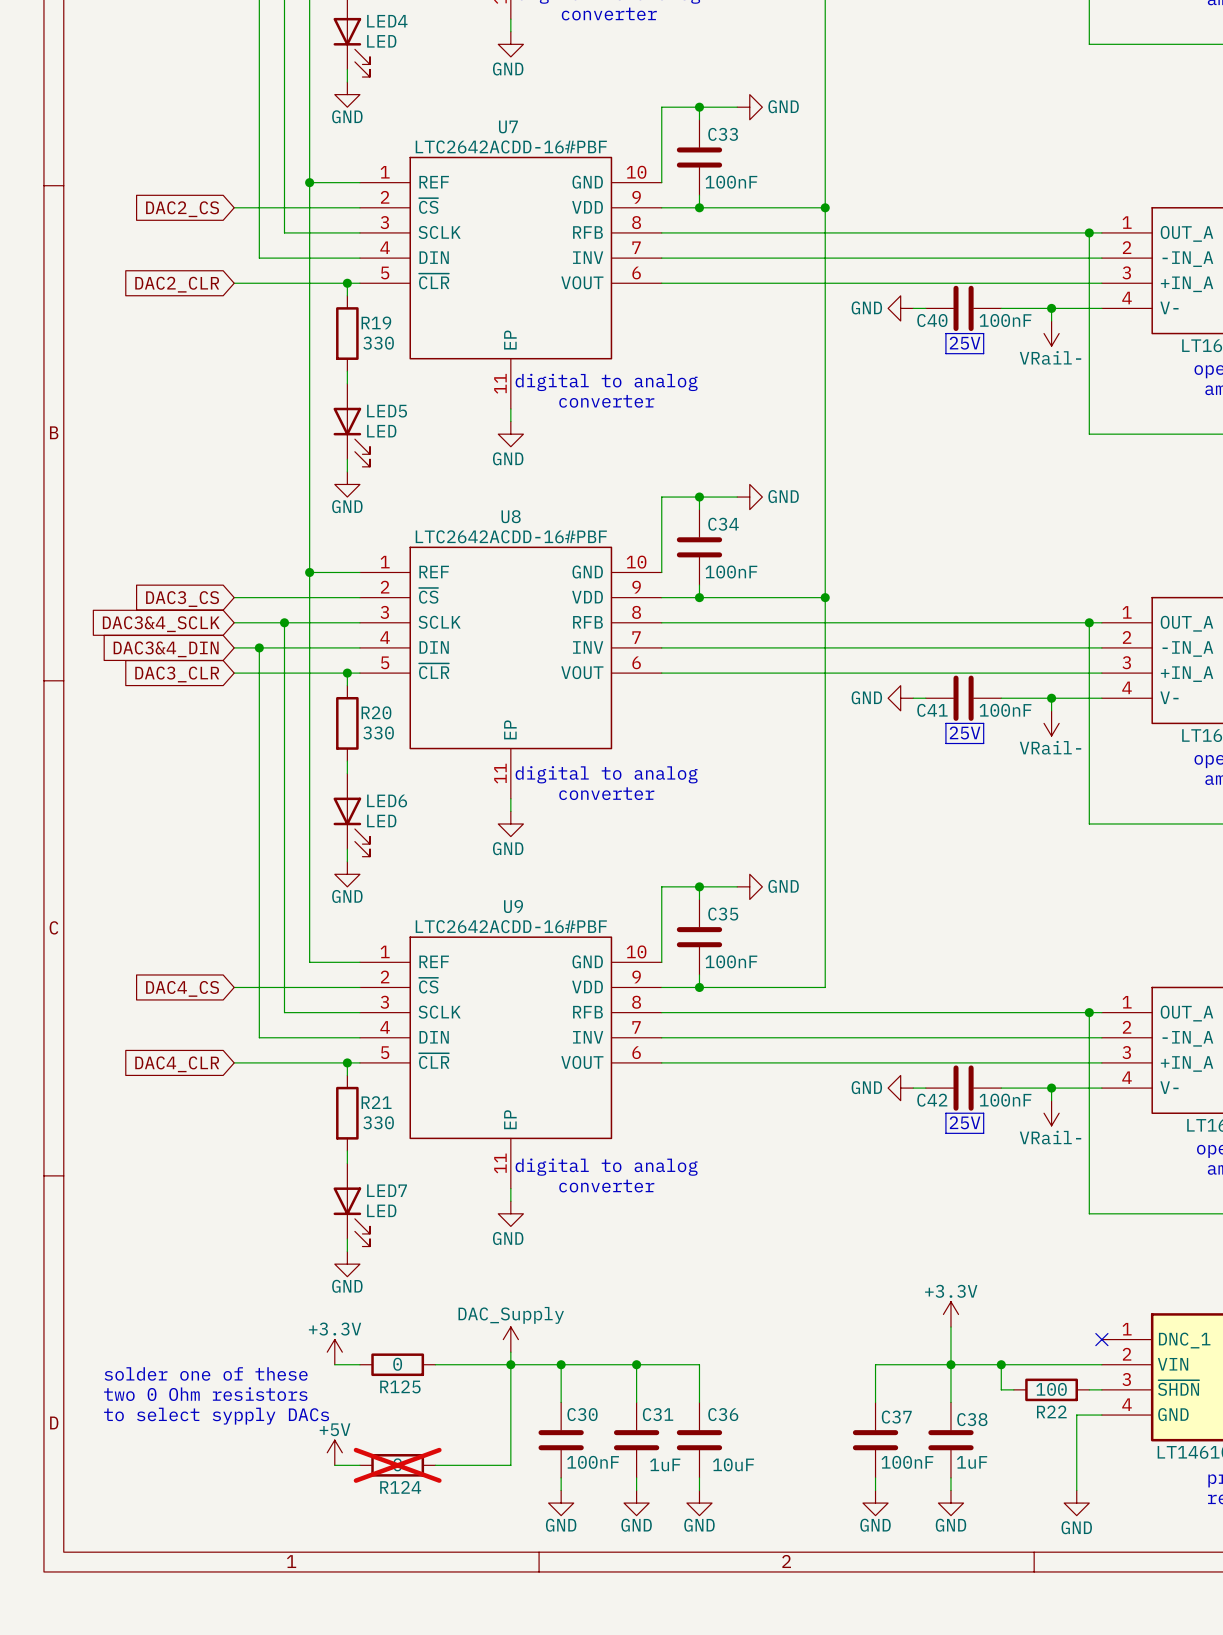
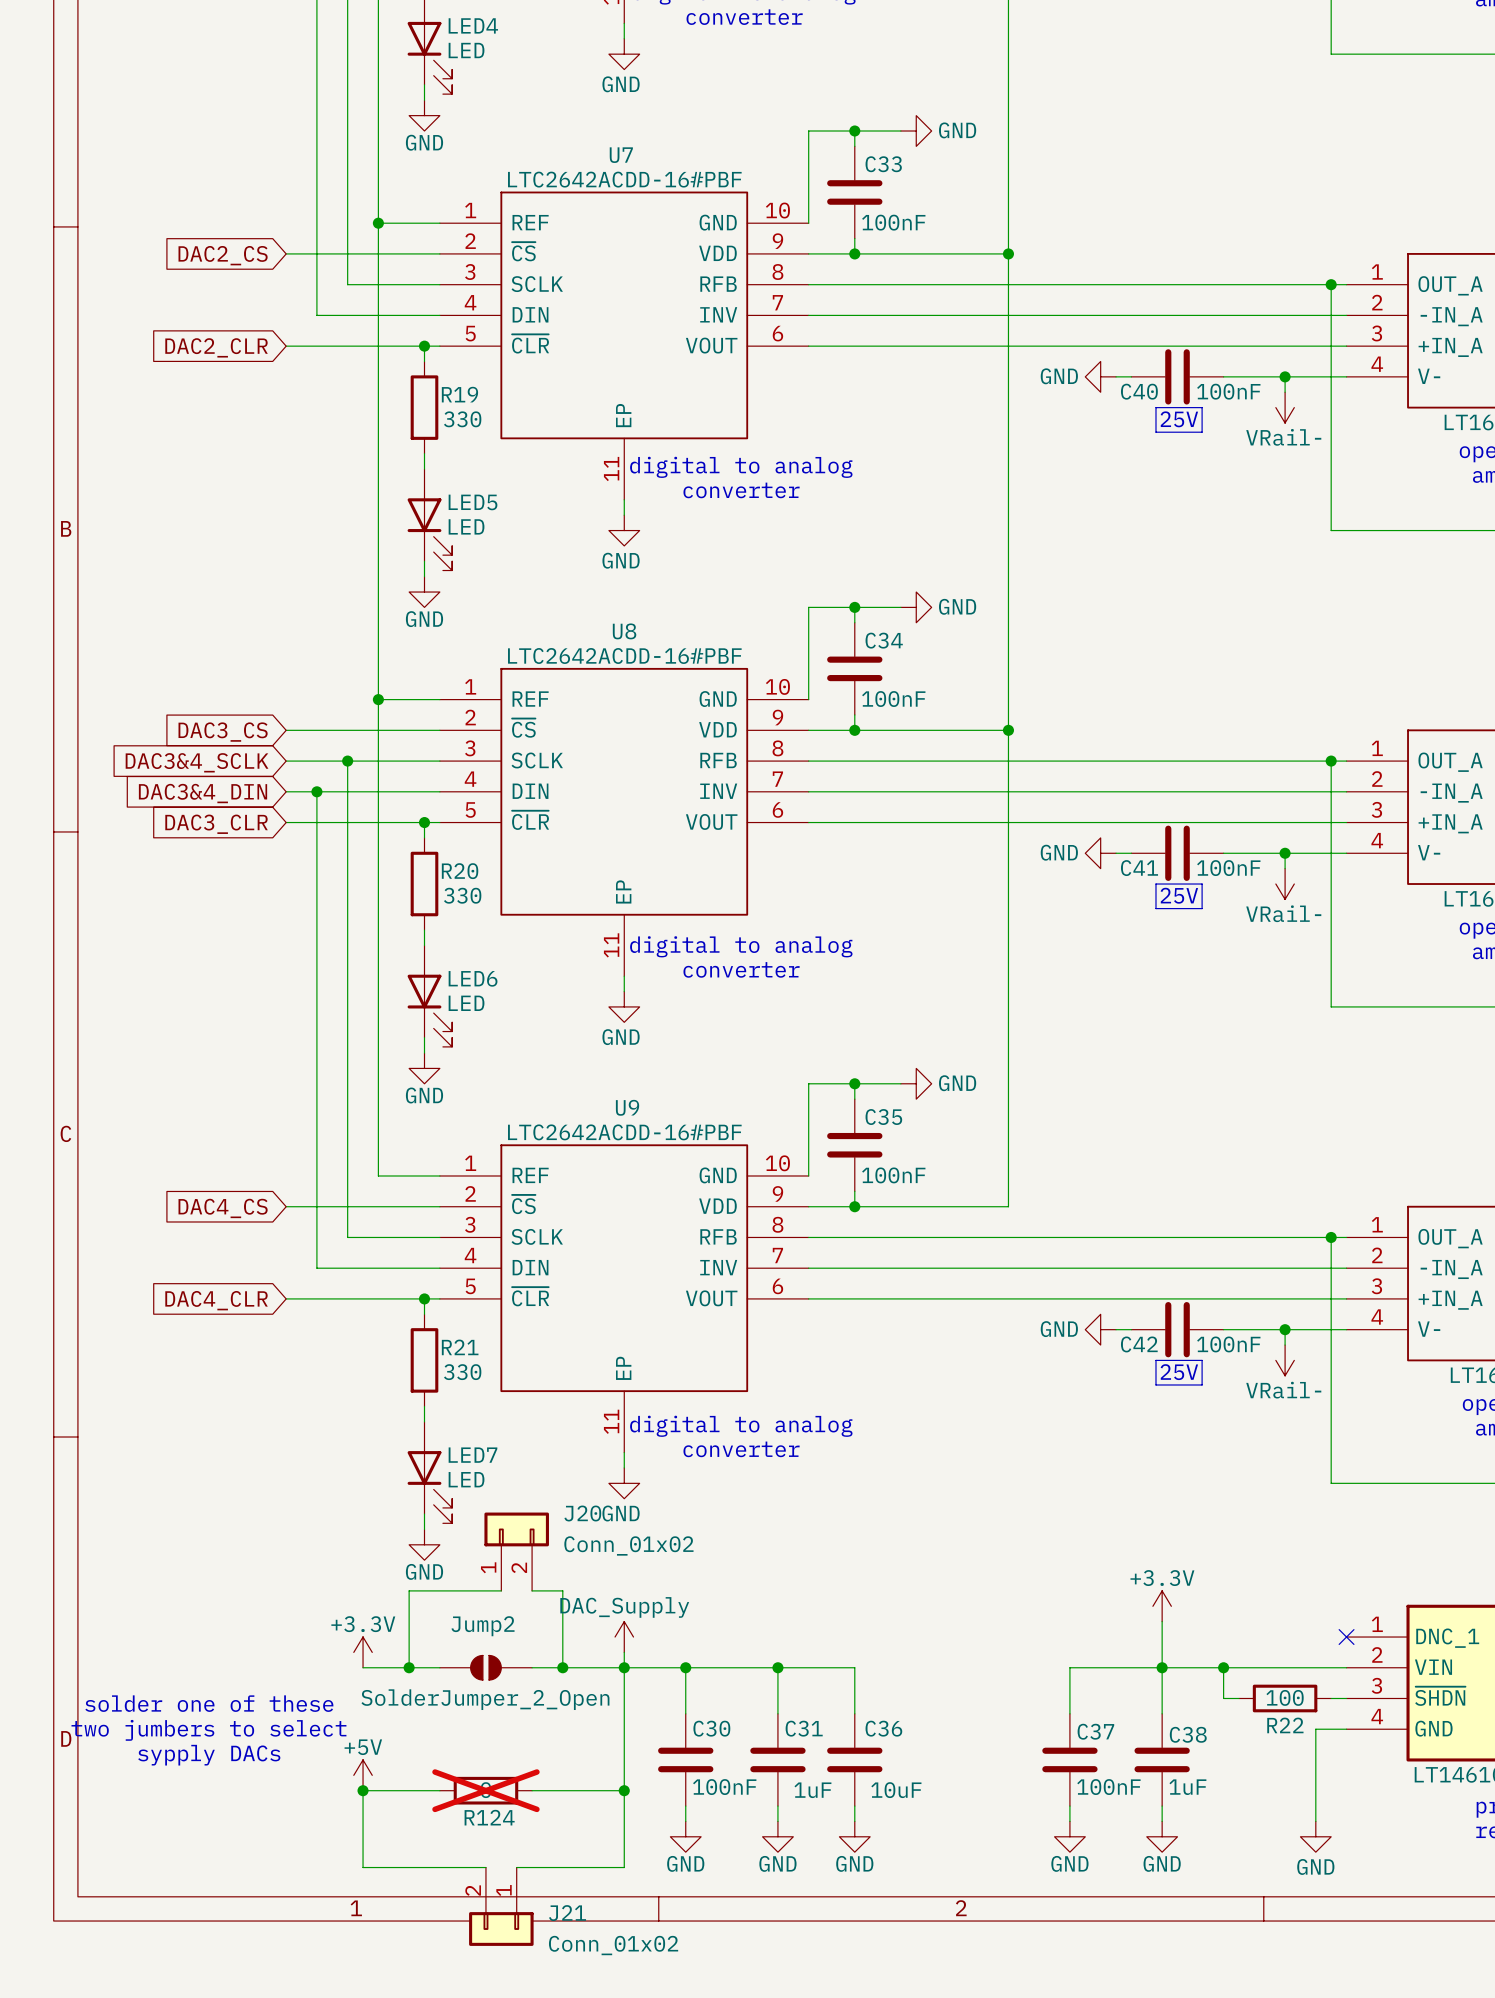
J20: none -> Conn_01x02 (516, 1551)
wire: none -> (501, 1590) (409, 1590) (409, 1667) (363, 1667)
wire: none -> (532, 1590) (562, 1590) (562, 1667)
power symbol position: +3.3V (334, 1352) -> +3.3V (363, 1652)
junction: none -> (409, 1667)
R125: 0 (397, 1364) -> none
Jump2: none -> SolderJumper_2_Open (485, 1667)
junction: none -> (562, 1667)
text position: solder one of these (206, 1373) -> solder one of these (209, 1703)
text: two 0 Ohm resistors (205, 1394) -> none
text: none -> two jumbers to select (208, 1730)
text: to select sypply DACs (216, 1416) -> sypply DACs (209, 1755)
power symbol position: +5V (334, 1452) -> +5V (363, 1775)
junction: none -> (363, 1790)
wire: none -> (409, 1790) (363, 1790) (363, 1867) (485, 1867)
wire: none -> (624, 1790) (624, 1867) (516, 1867)
junction: none -> (624, 1790)
J21: none -> Conn_01x02 (501, 1906)

